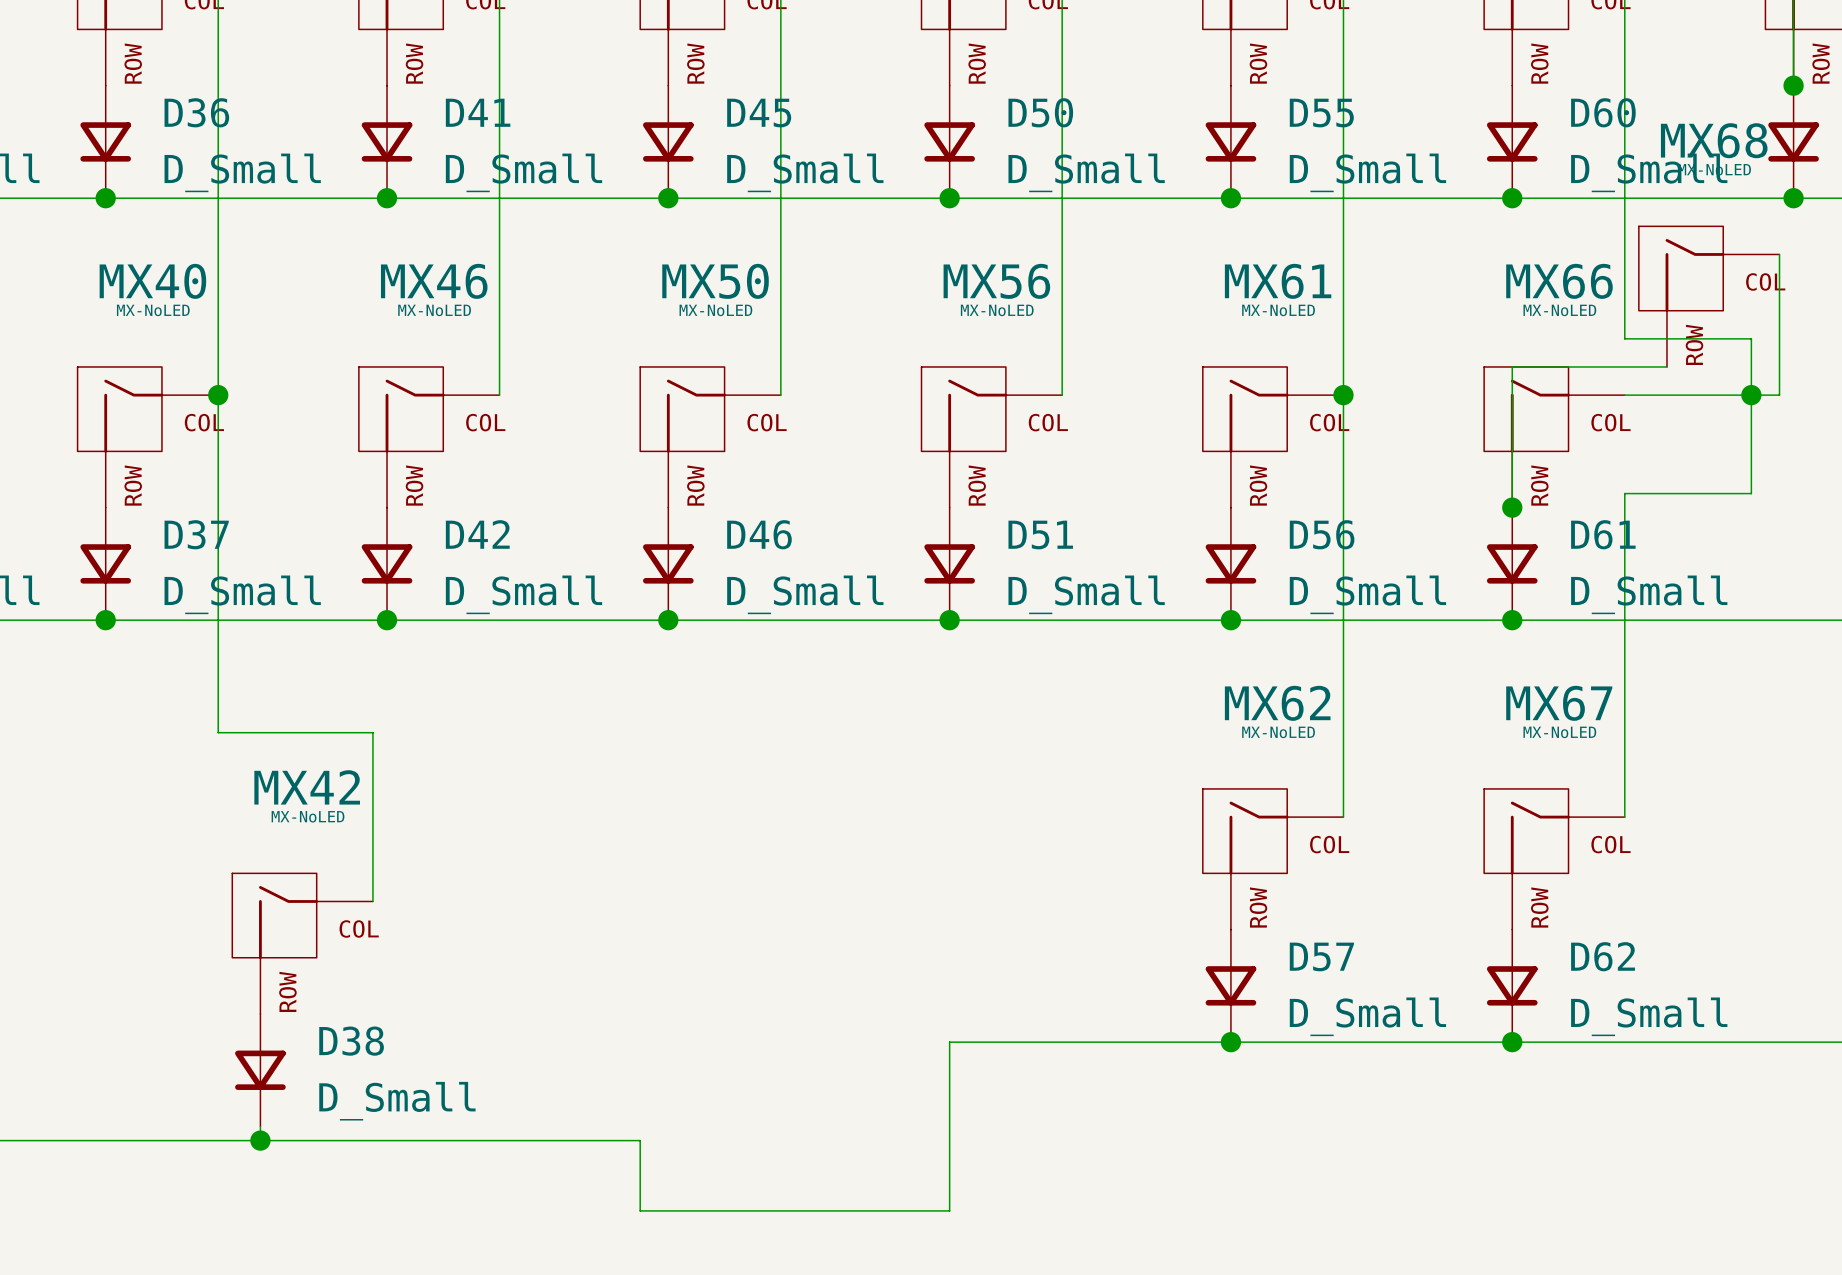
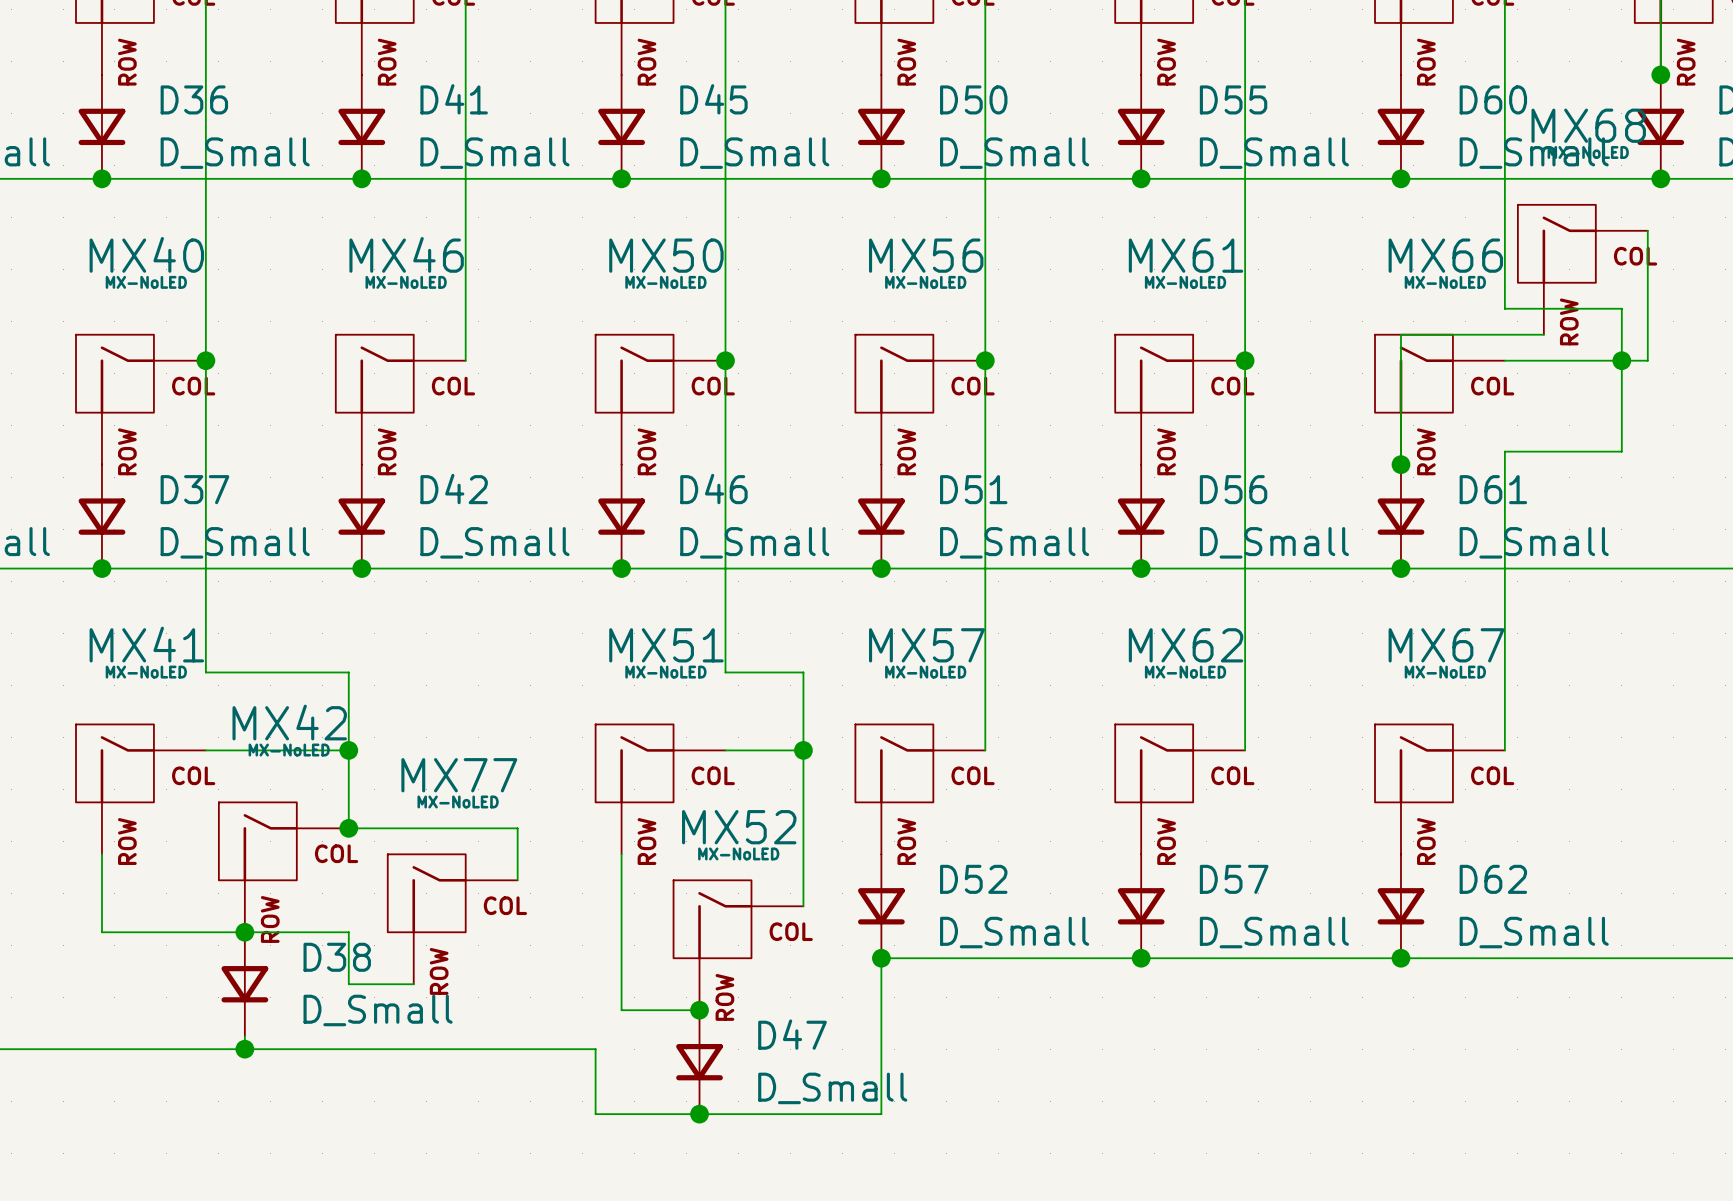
wire: none -> (725, 360) (725, 672) (803, 672) (803, 906)
junction: none -> (725, 360)
wire: none -> (985, 360) (985, 750)
junction: none -> (985, 360)
wire: none -> (205, 750) (348, 750)
junction: none -> (348, 750)
wire: none -> (725, 750) (803, 750)
junction: none -> (803, 750)
MX41: none -> MX-NoLED (140, 789)
MX51: none -> MX-NoLED (660, 789)
MX57: none -> MX-NoLED (920, 789)
wire: none -> (348, 828) (517, 828) (517, 880)
junction: none -> (348, 828)
wire: none -> (101, 854) (101, 932) (348, 932) (348, 984) (413, 984)
wire: none -> (621, 854) (621, 1010) (699, 1010)
D52: none -> D_Small (881, 906)
MX77: none -> MX-NoLED (452, 919)
junction: none -> (244, 932)
MX52: none -> MX-NoLED (738, 945)
junction: none -> (881, 958)
junction: none -> (699, 1010)
D47: none -> D_Small (699, 1062)
junction: none -> (699, 1114)

